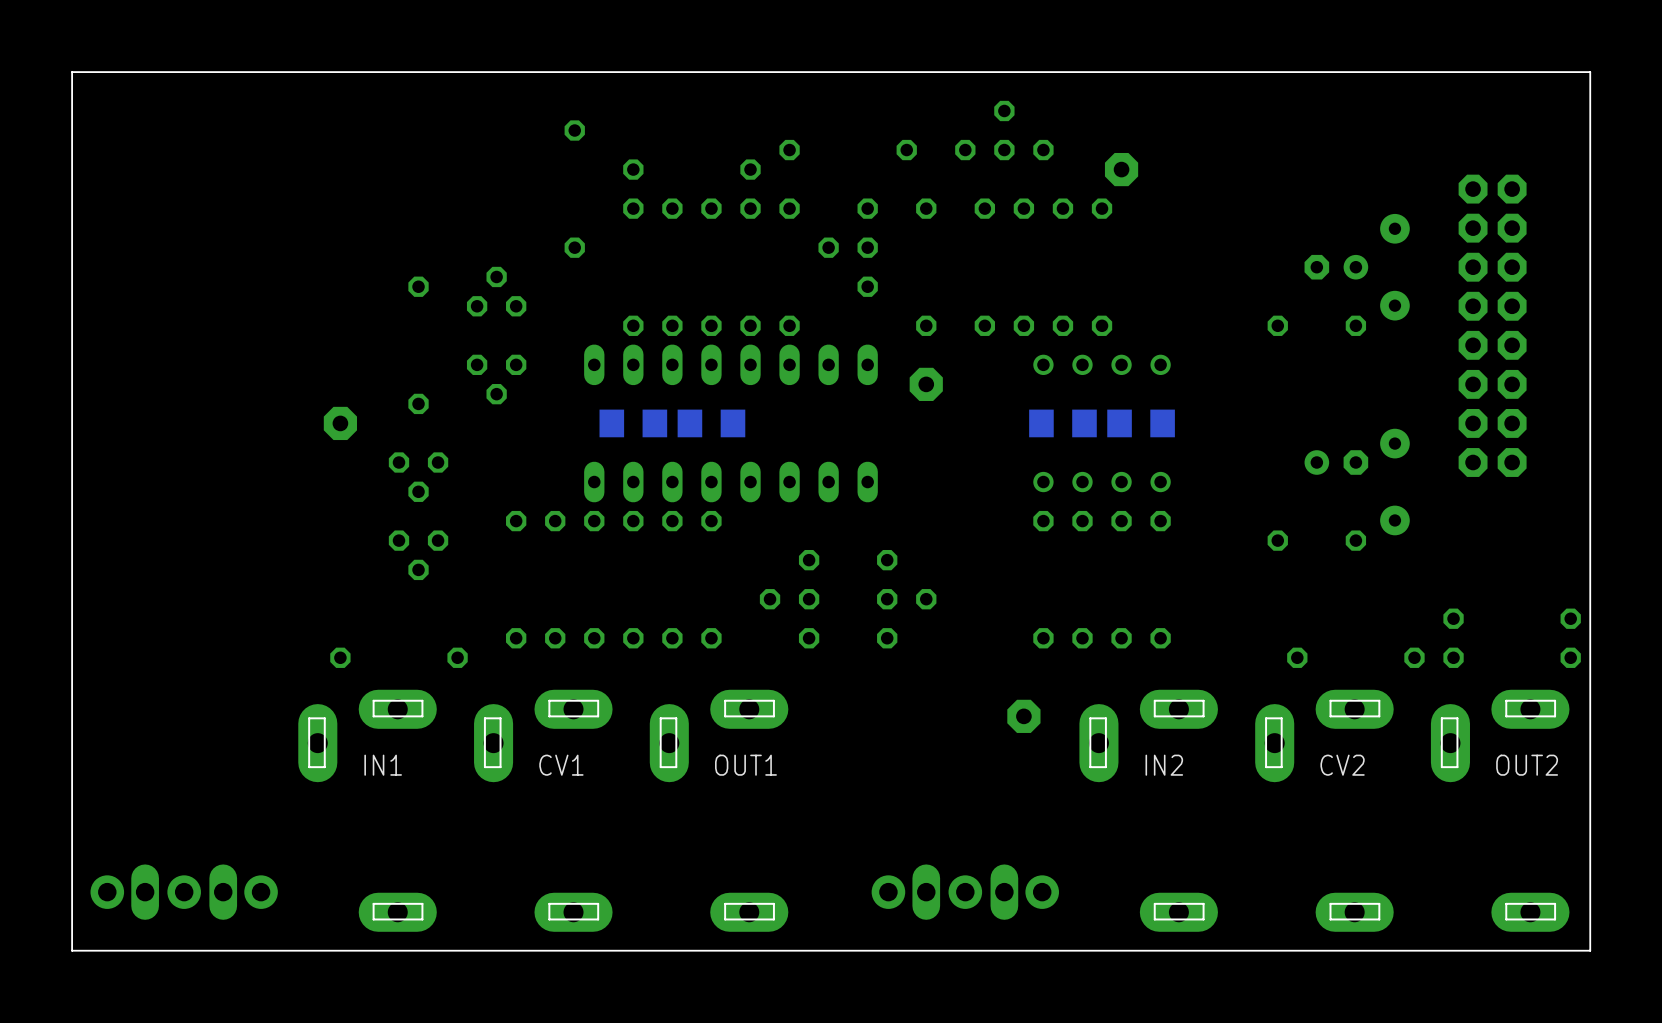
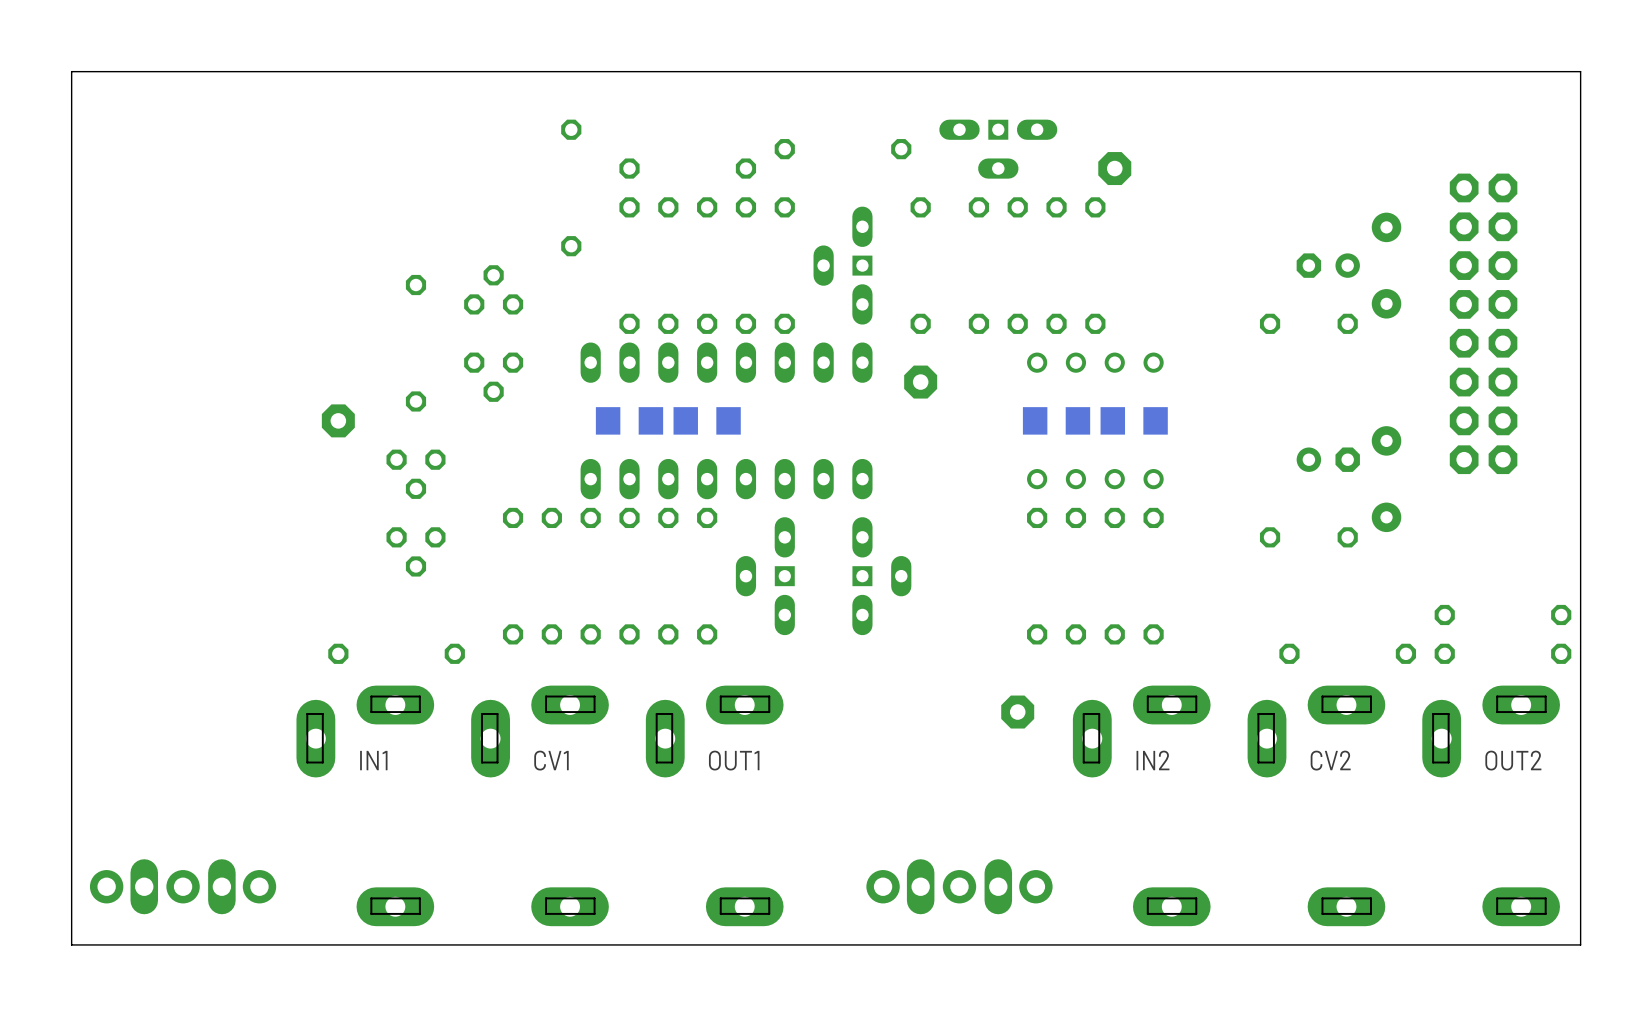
part: (1004, 130) -> none
part: none -> (998, 149)
part: (848, 247) -> none
part: none -> (843, 265)
part: none -> (765, 576)
part: none -> (881, 576)
part: (789, 599) -> none
part: (906, 599) -> none

